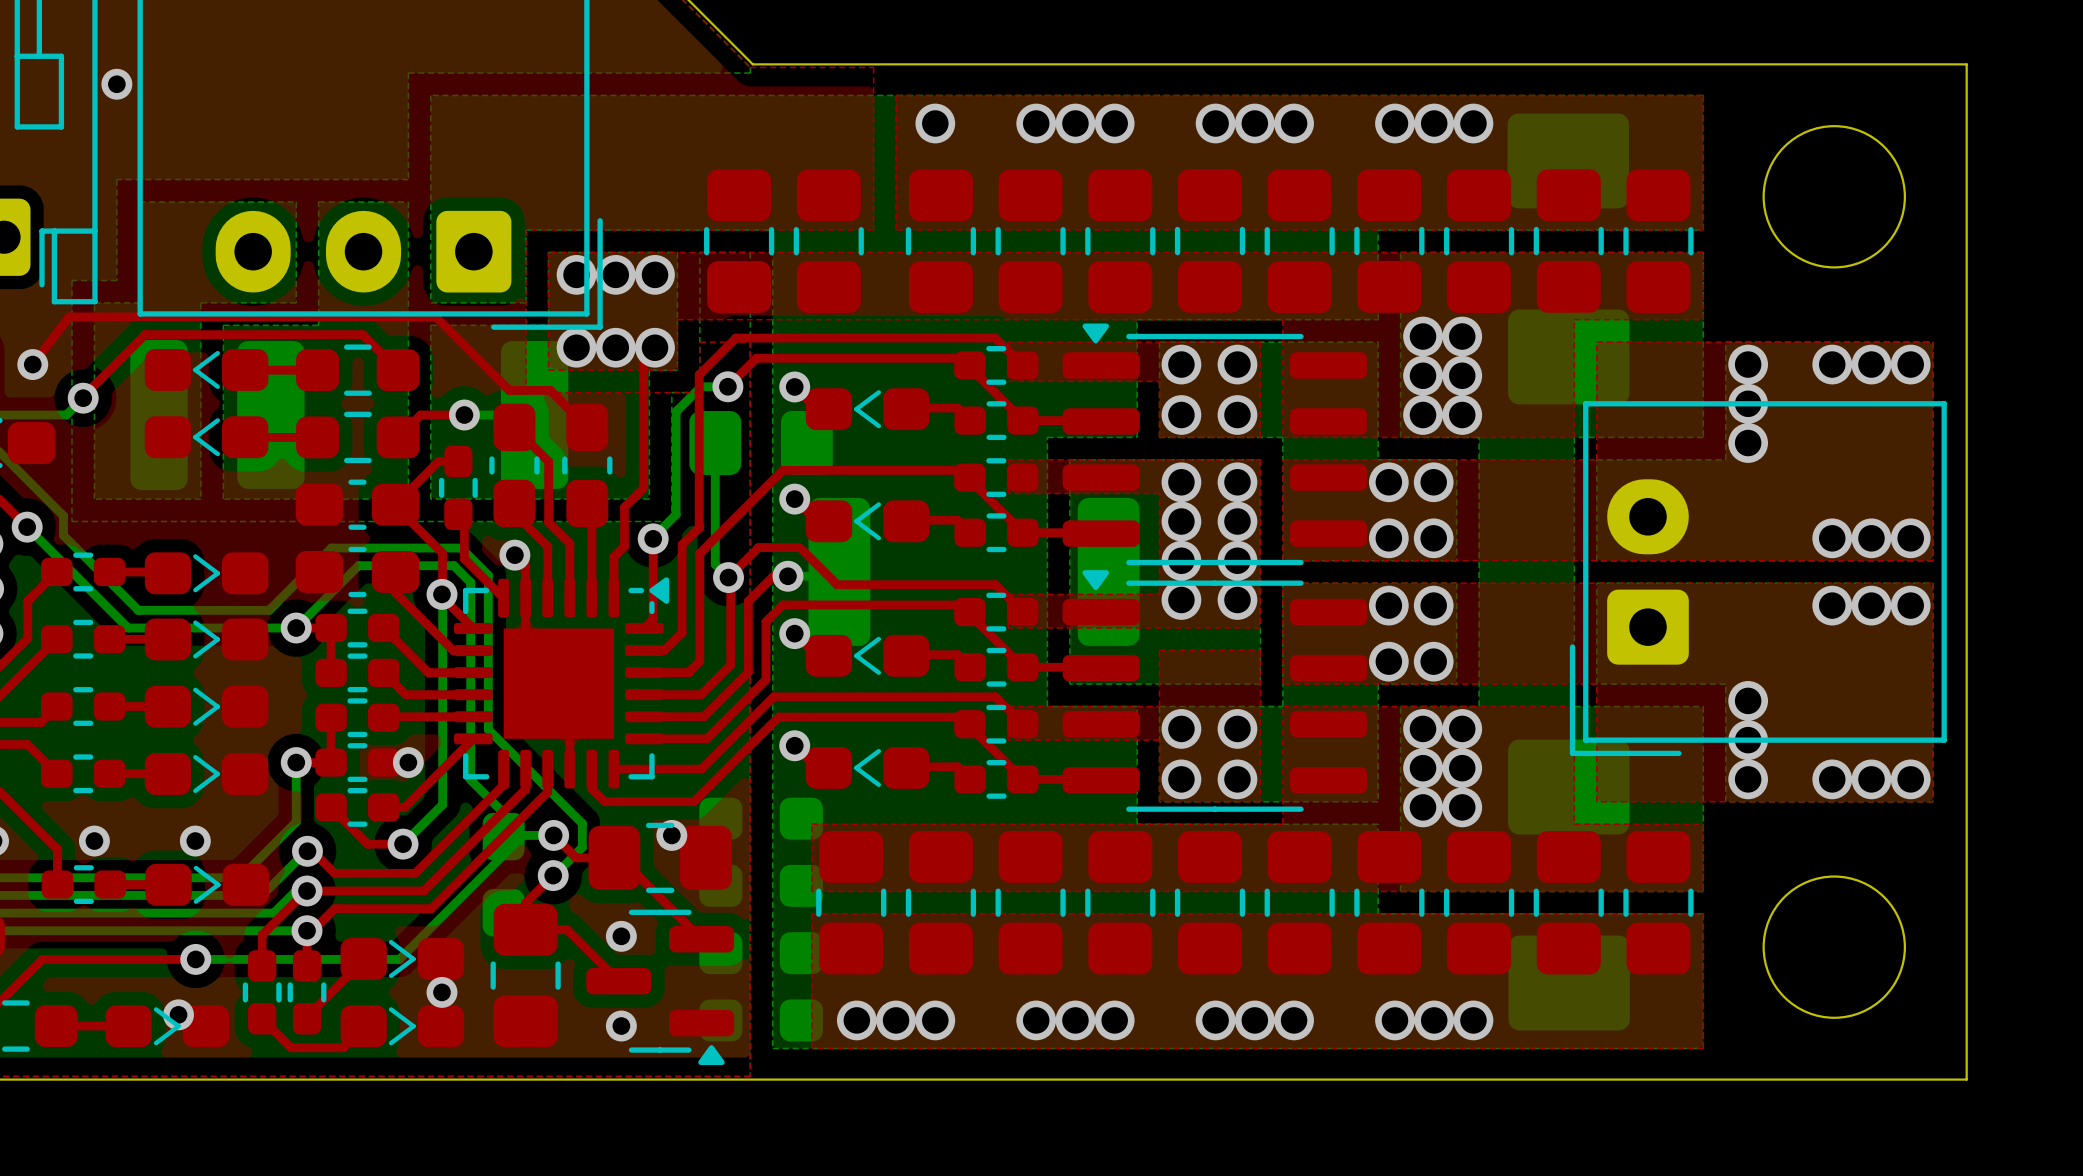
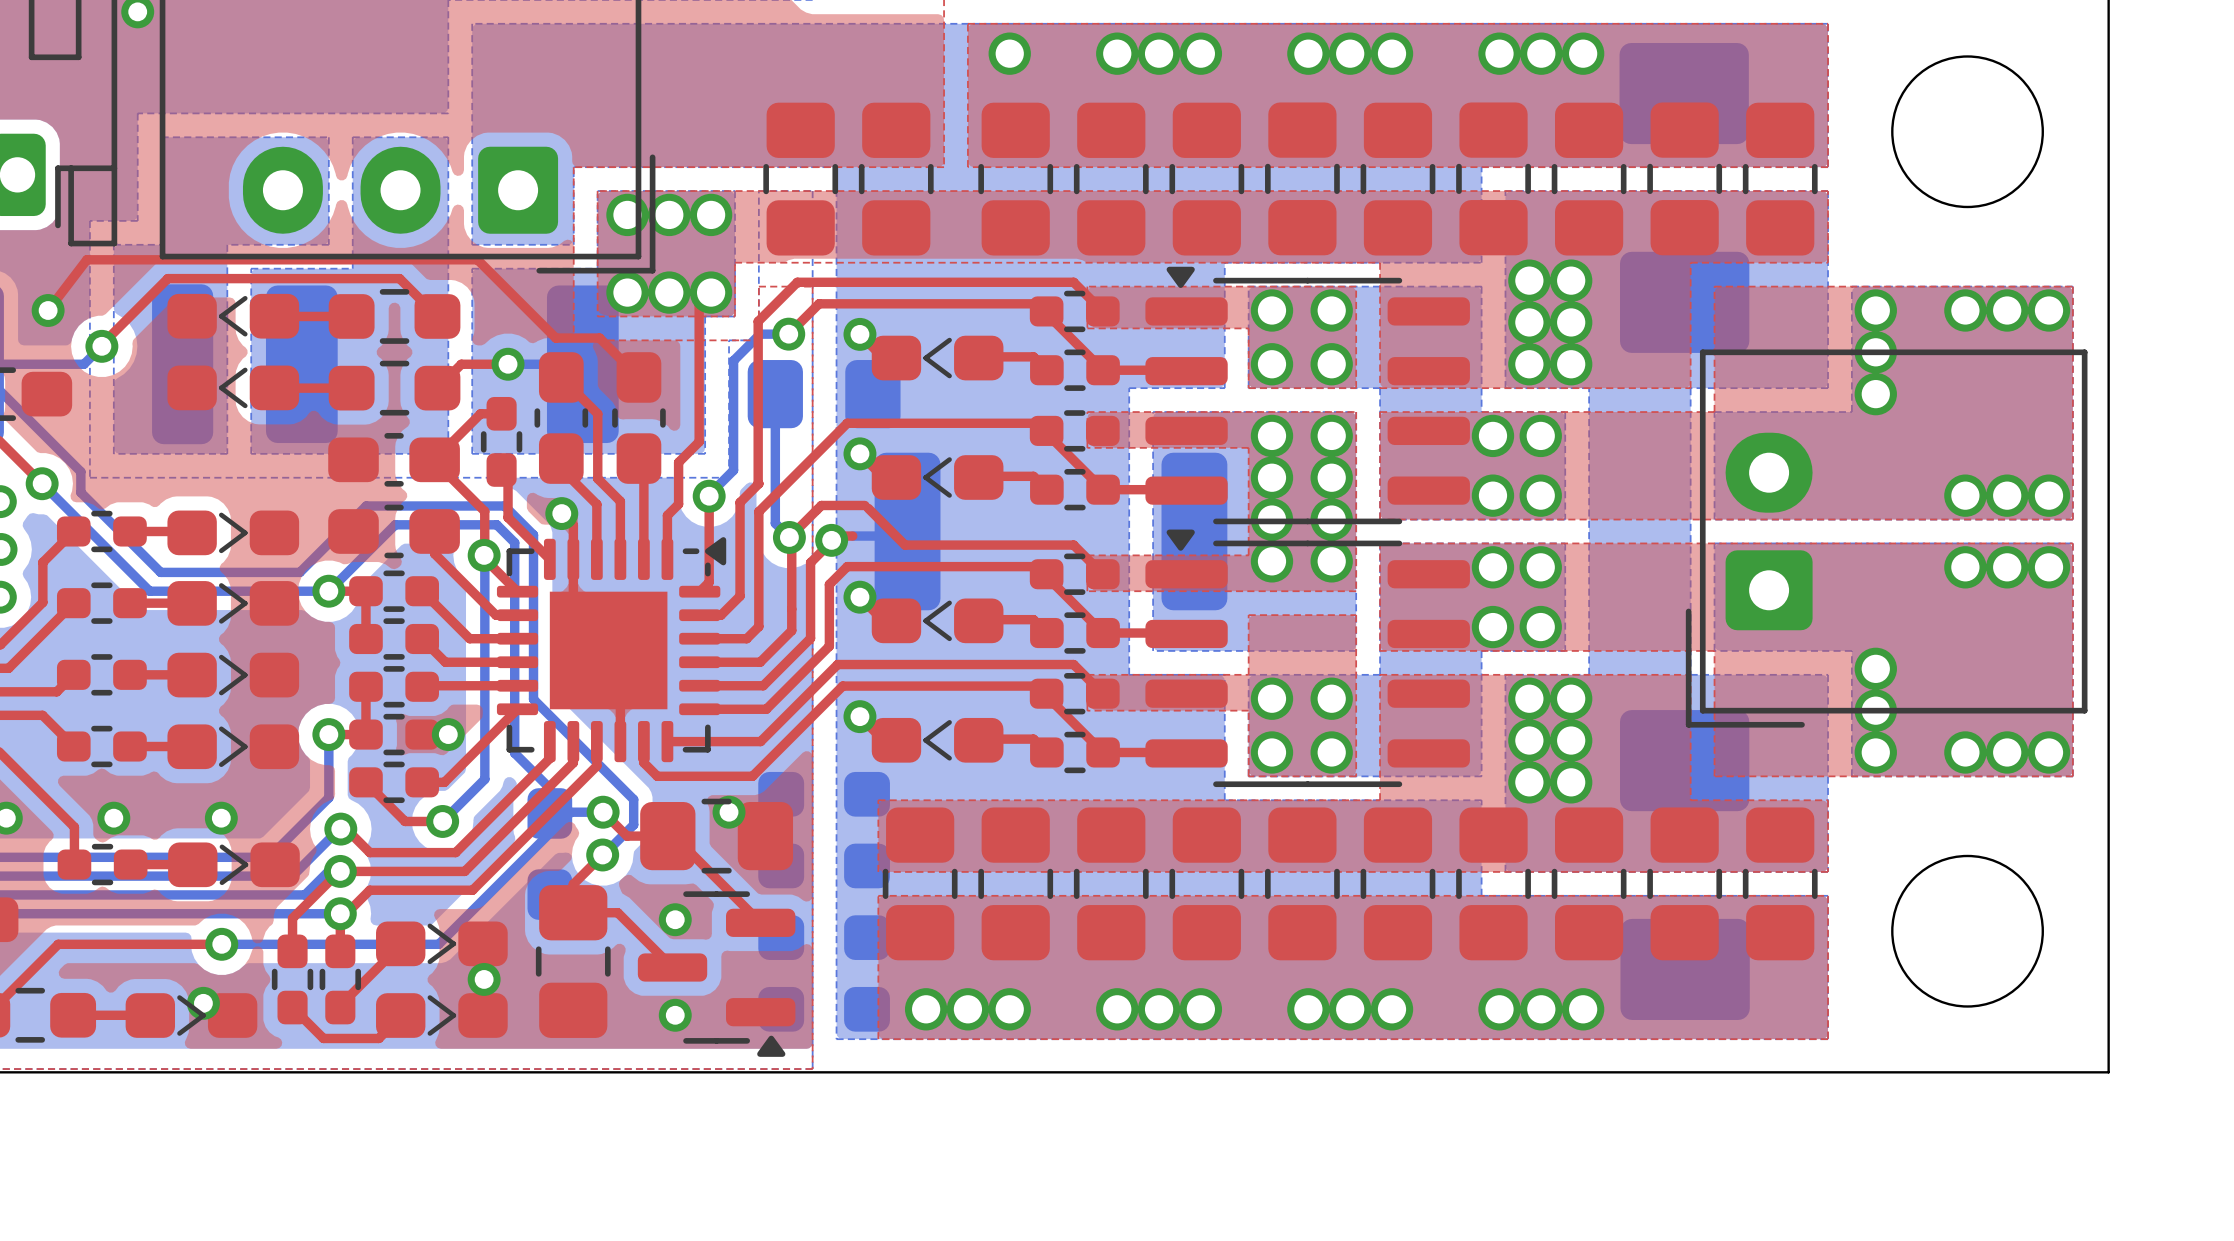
via position: (787, 576) -> (831, 540)

